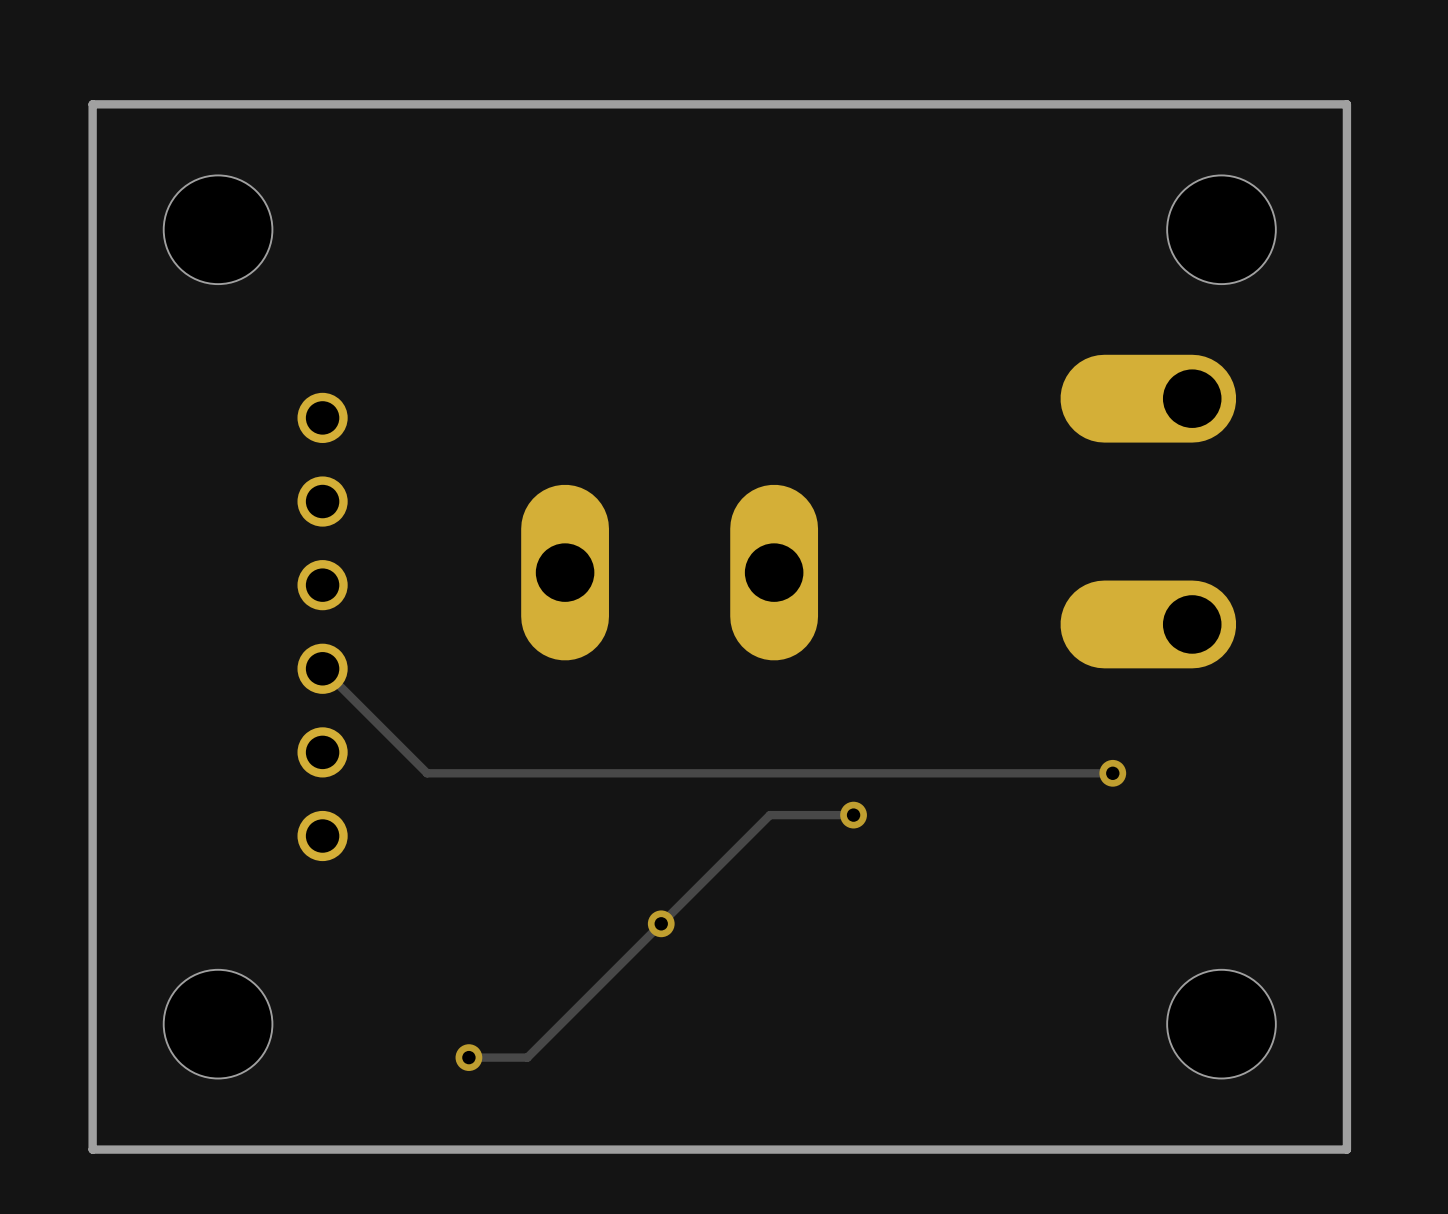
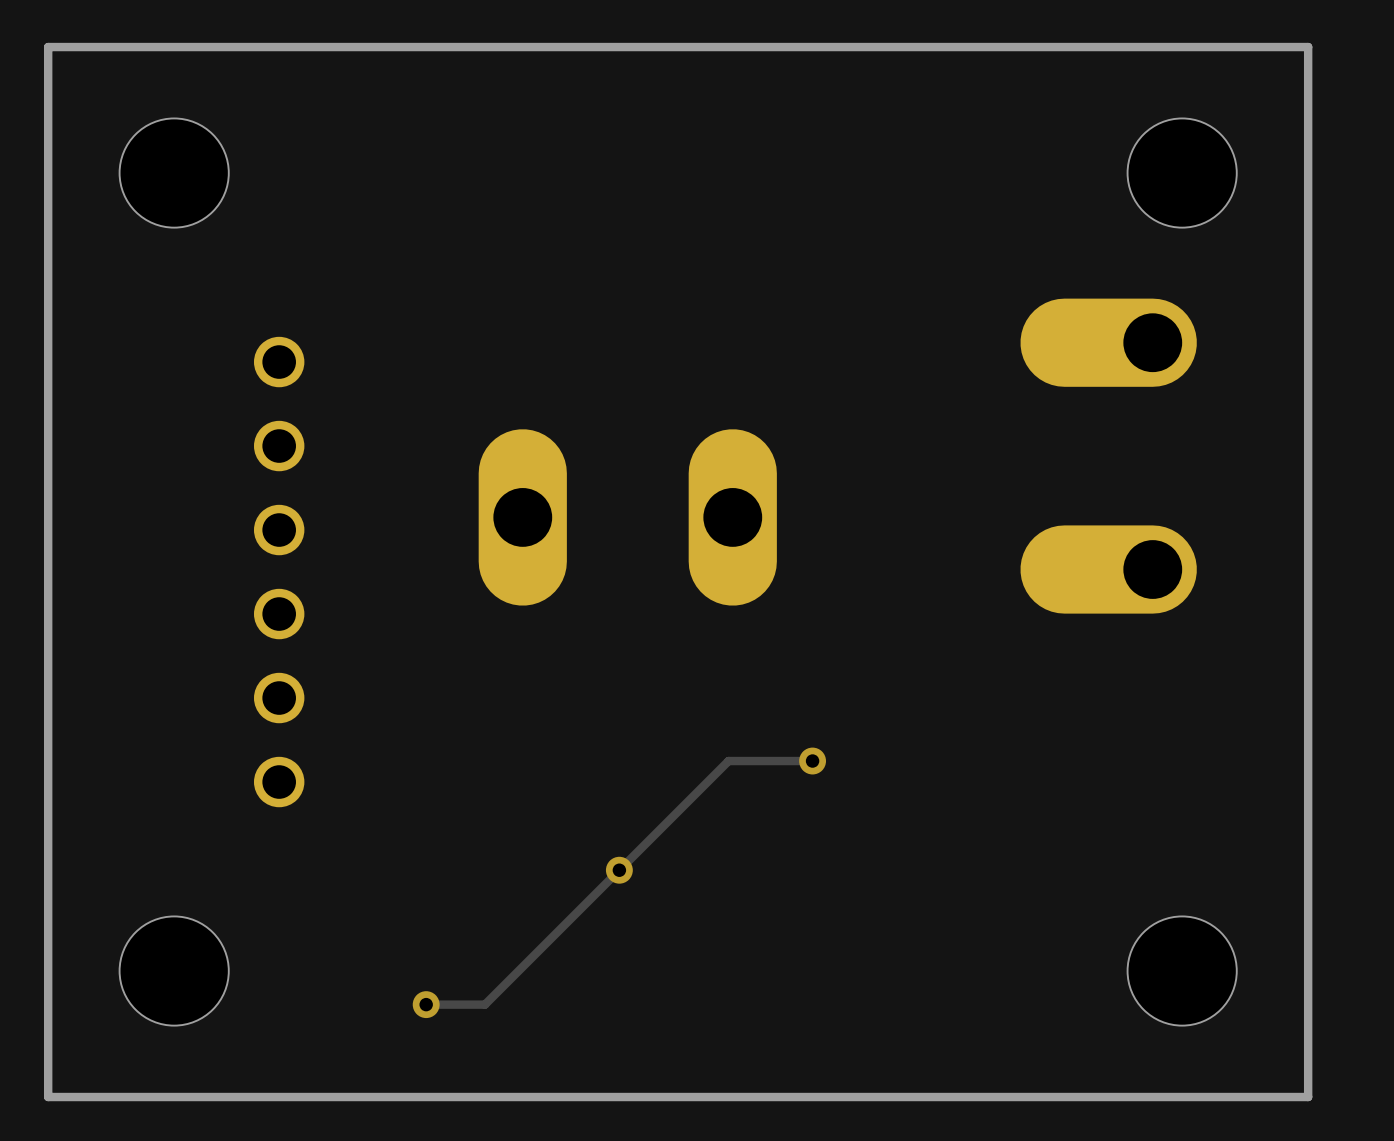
track: (322, 668) (427, 773) (1112, 773) -> none
via: (1112, 773) -> none

